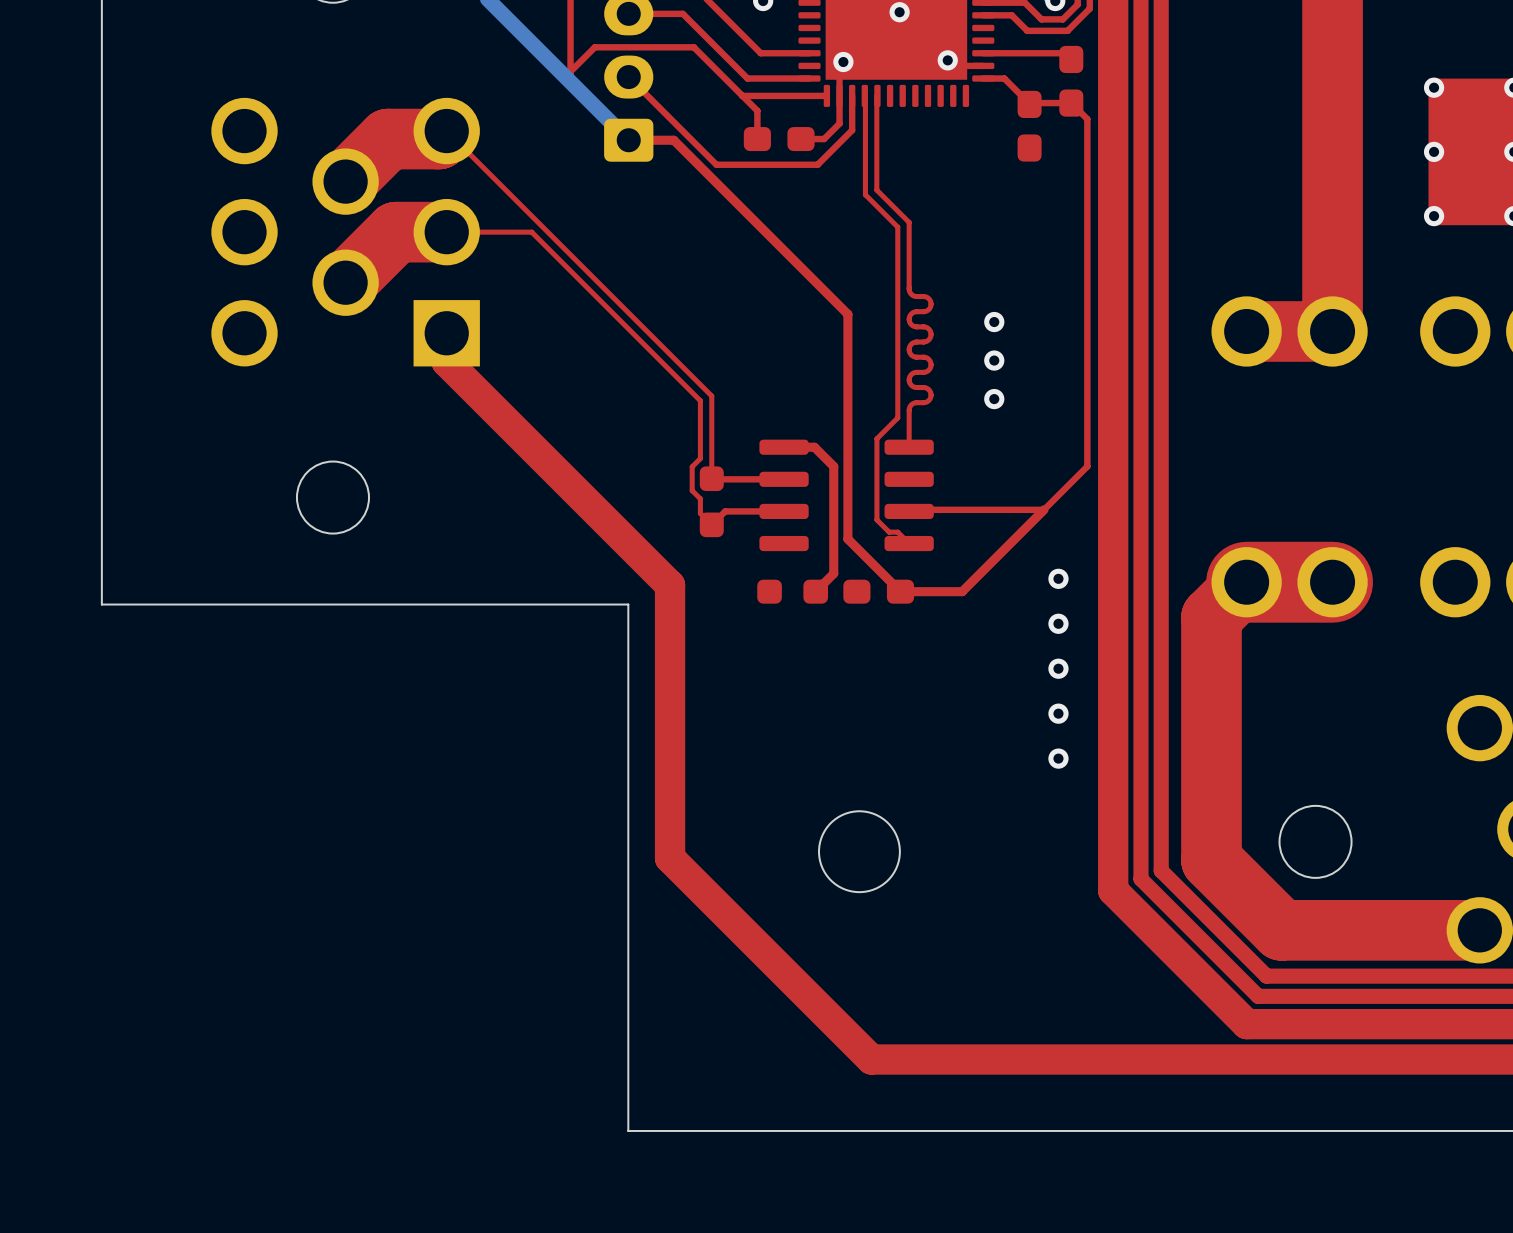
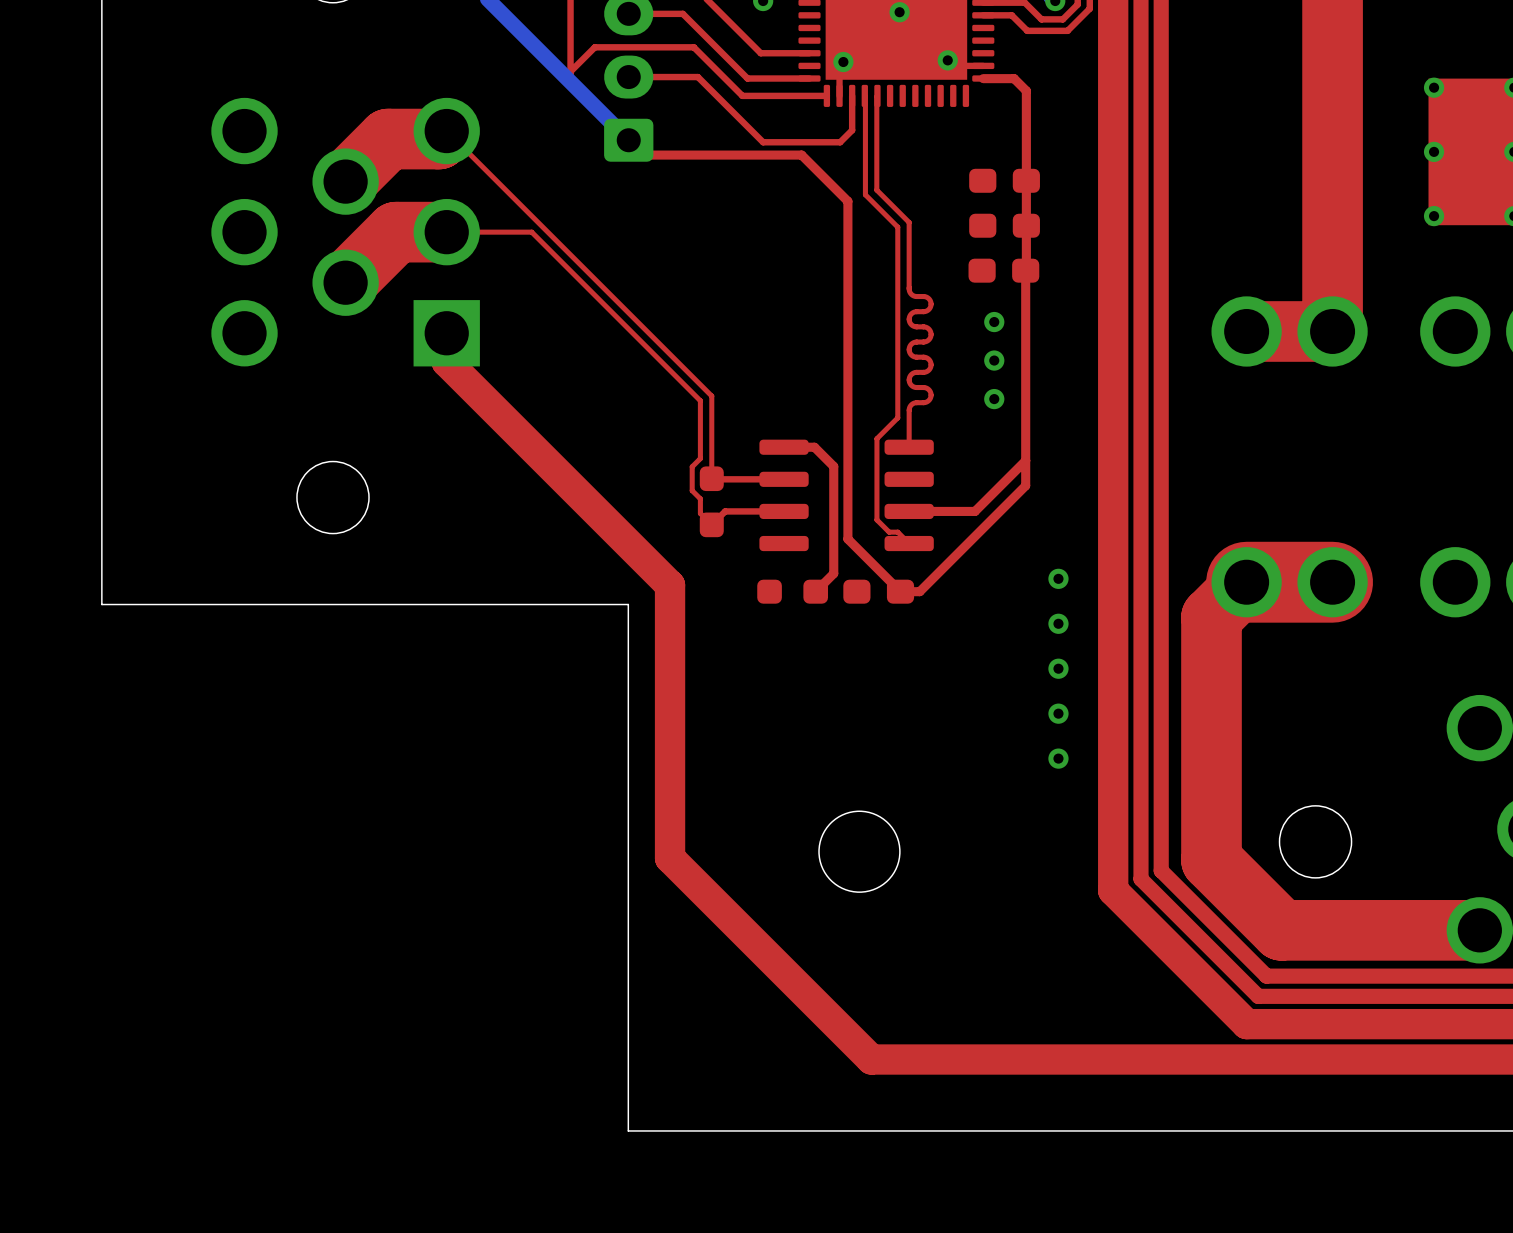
top track: (983, 53) (1065, 53) (1071, 59) -> none
top track: (628, 77) (716, 164) (817, 164) (840, 142) -> (628, 77) (697, 77) (763, 142) (840, 142)
top track: (983, 78) (1004, 78) (1029, 104) (1071, 103) (1087, 119) (1087, 466) (1044, 509) -> (983, 78) (1014, 78) (1026, 90) (1025, 485) (919, 591)
part: (1071, 81) -> none
top track: (742, 95) (757, 110) (757, 139) -> none
top track: (839, 95) (839, 123) (824, 139) (800, 139) -> none
part: (1029, 126) -> none
part: (779, 139) -> none
top track: (628, 140) (673, 140) (847, 314) -> (628, 140) (643, 155) (801, 155) (847, 201) (847, 314)
part: none -> (1004, 180)
part: none -> (1004, 225)
part: none -> (1003, 270)
top track: (1044, 509) (910, 509) (909, 511) -> (1025, 460) (975, 511) (909, 511)
top track: (1044, 509) (962, 591) (919, 591) -> none

